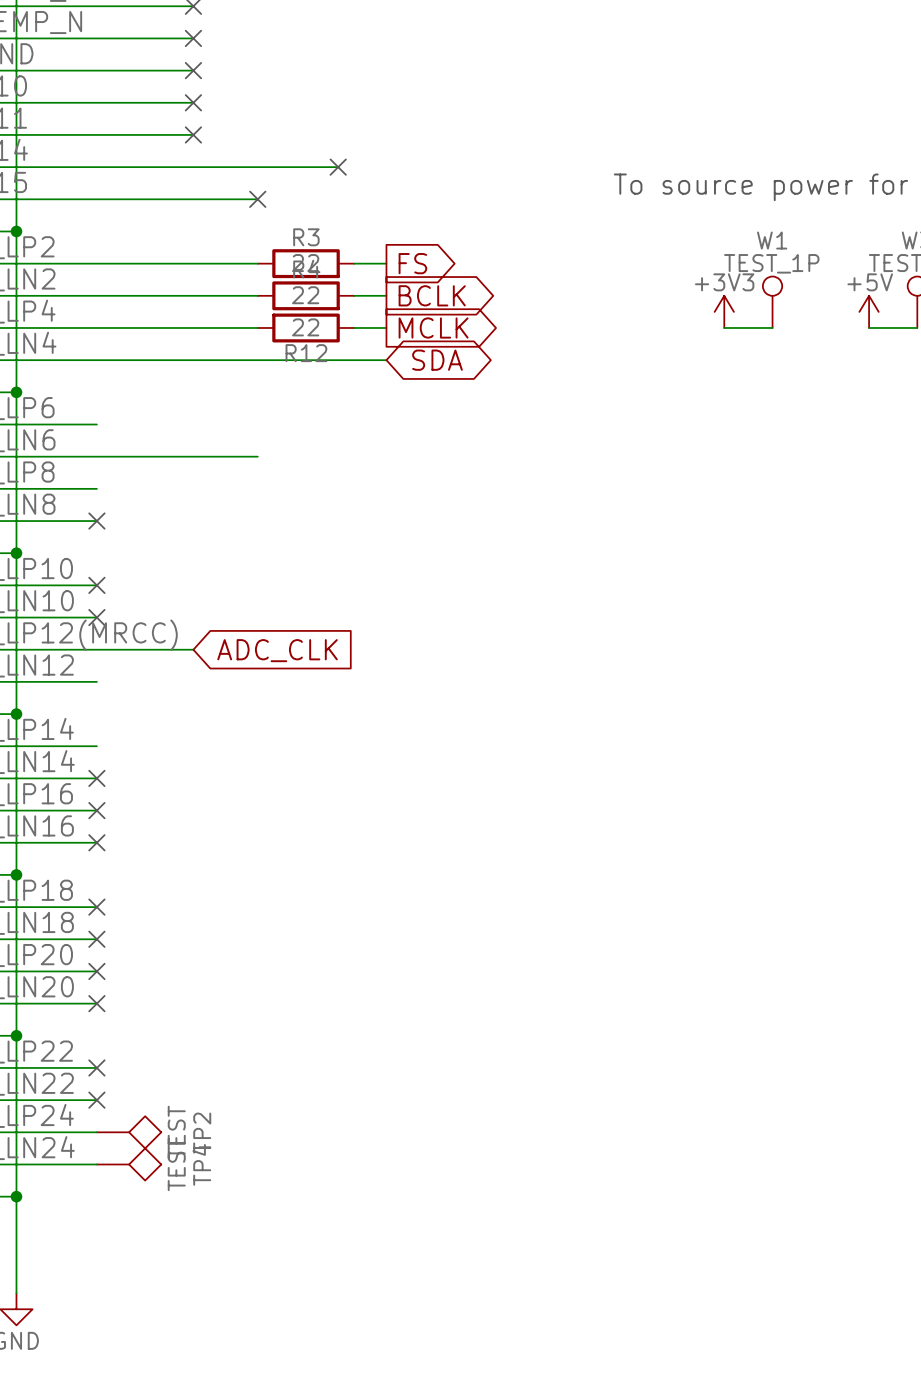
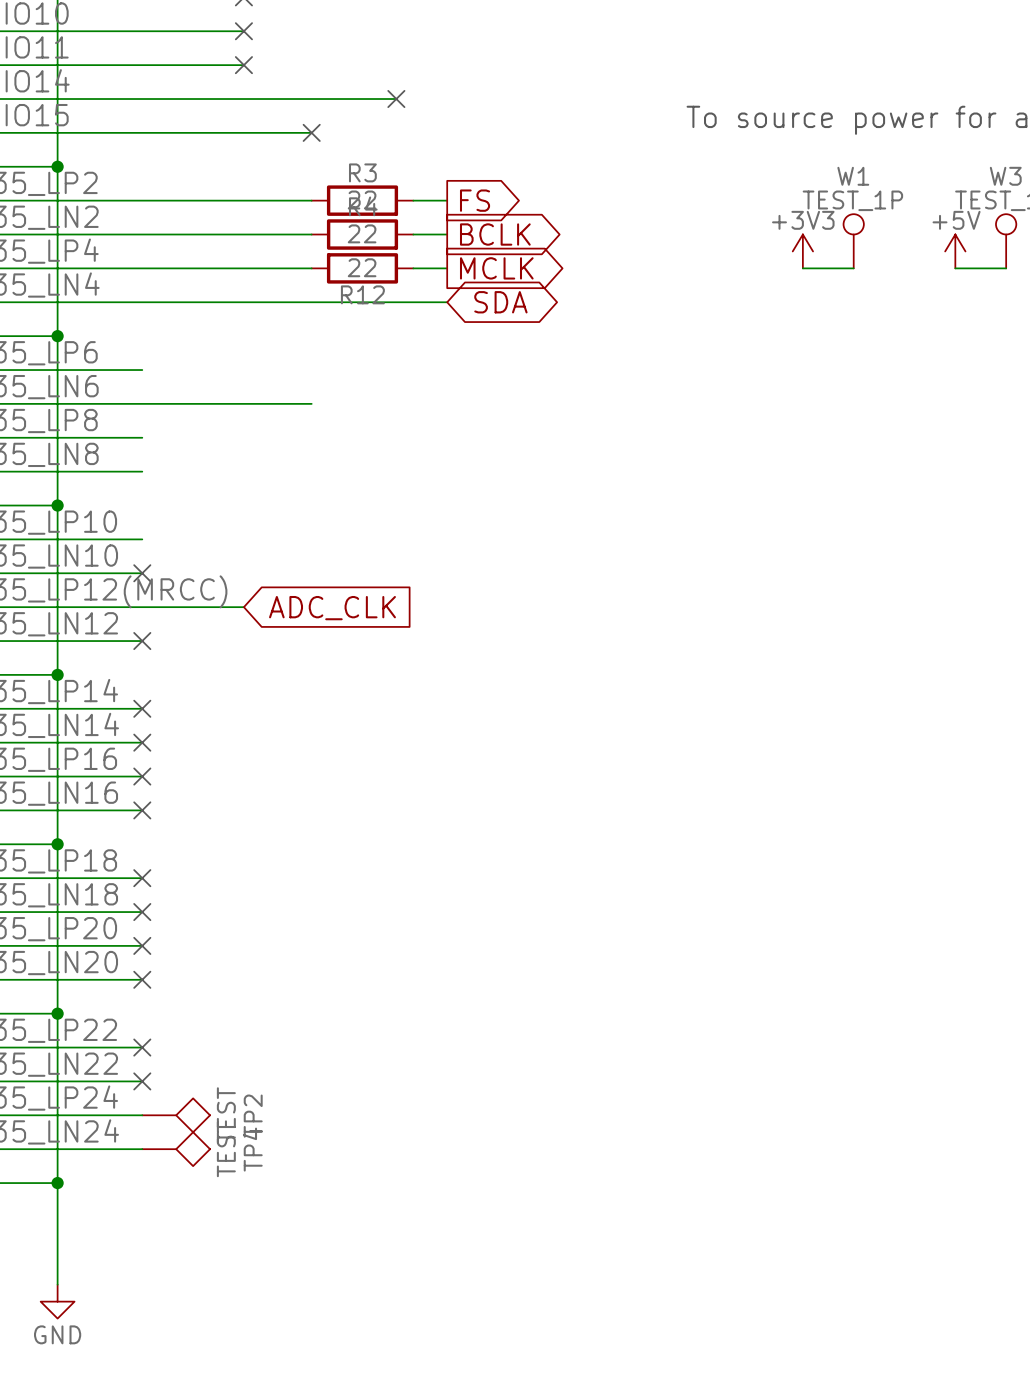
no-connect mark: (96, 521) -> none
no-connect mark: (96, 585) -> none
no-connect mark: none -> (142, 641)
no-connect mark: none -> (142, 708)

